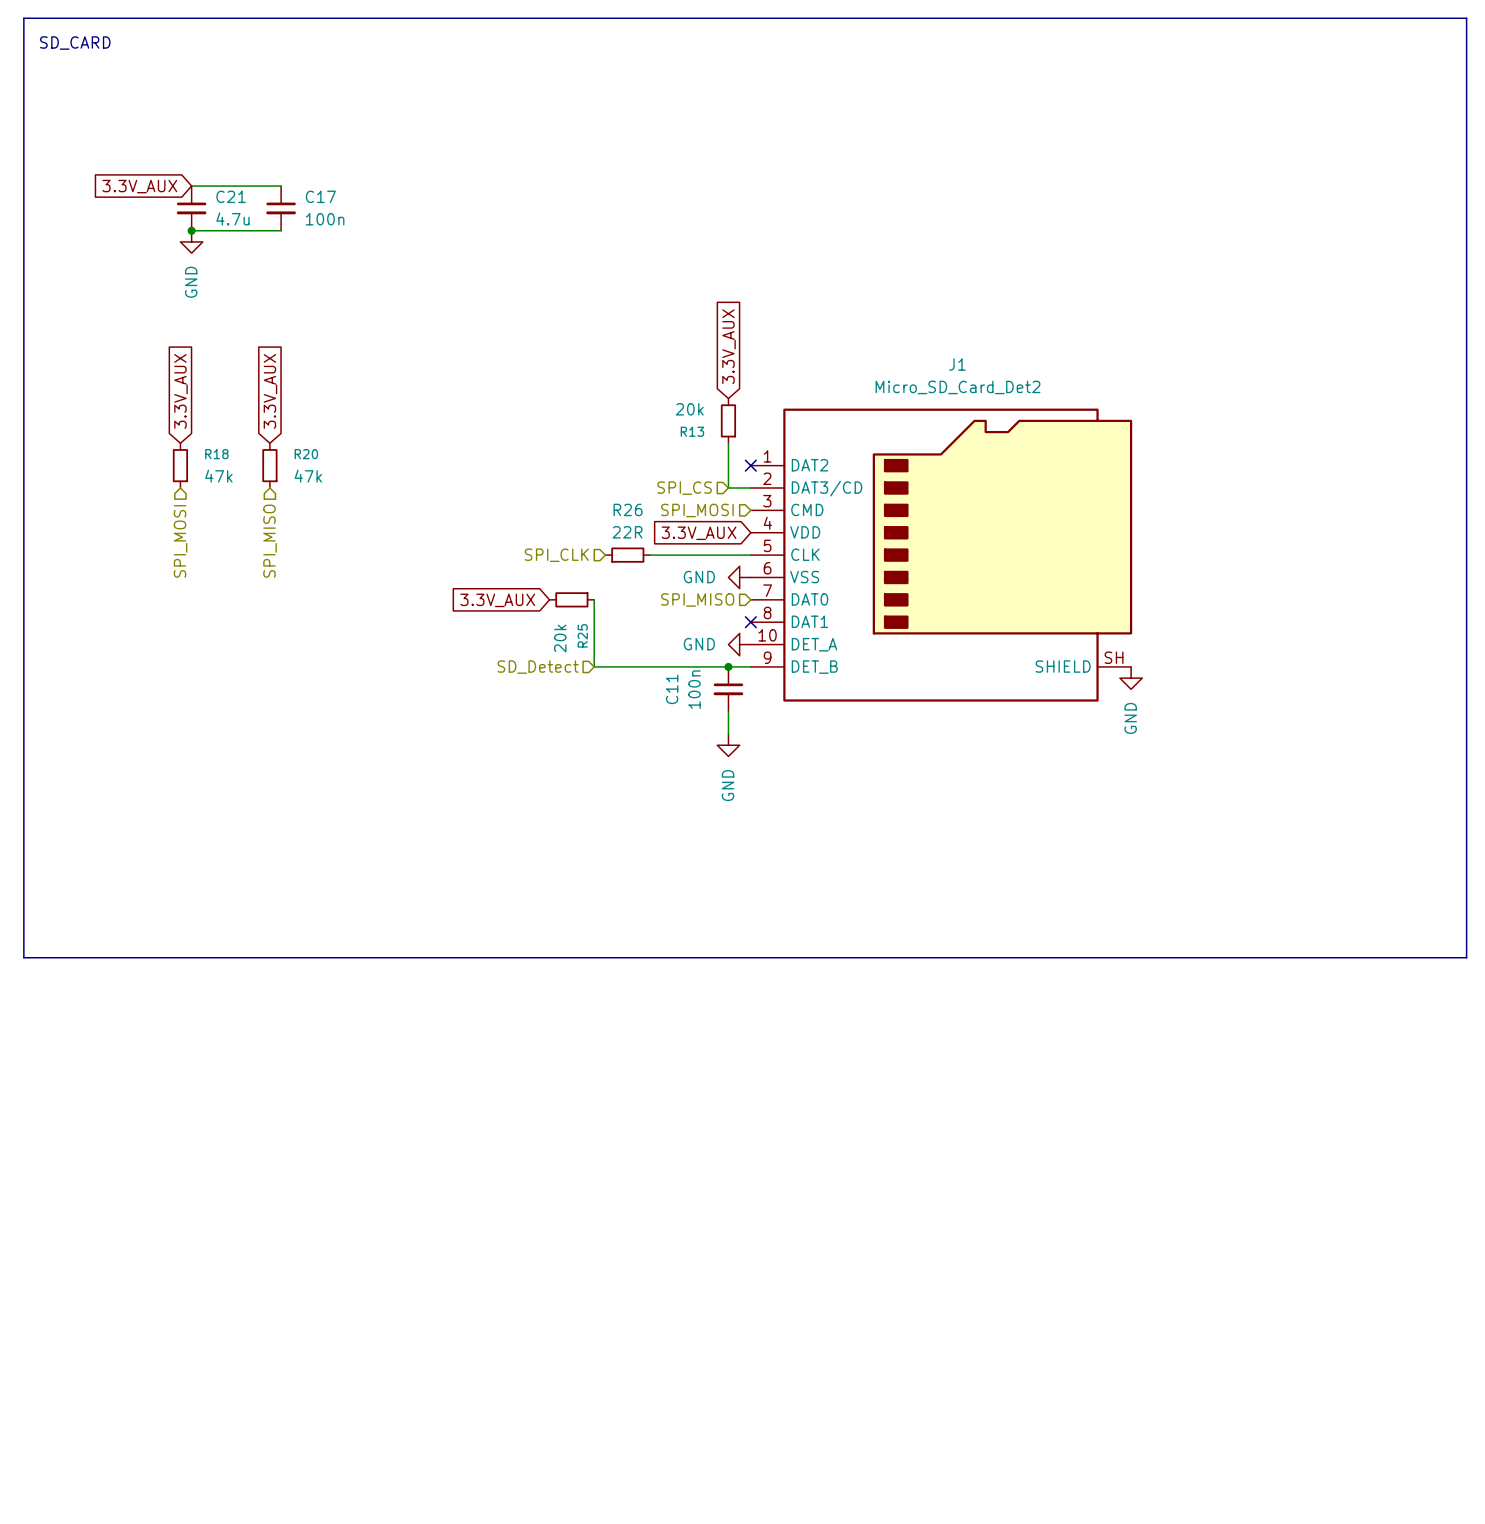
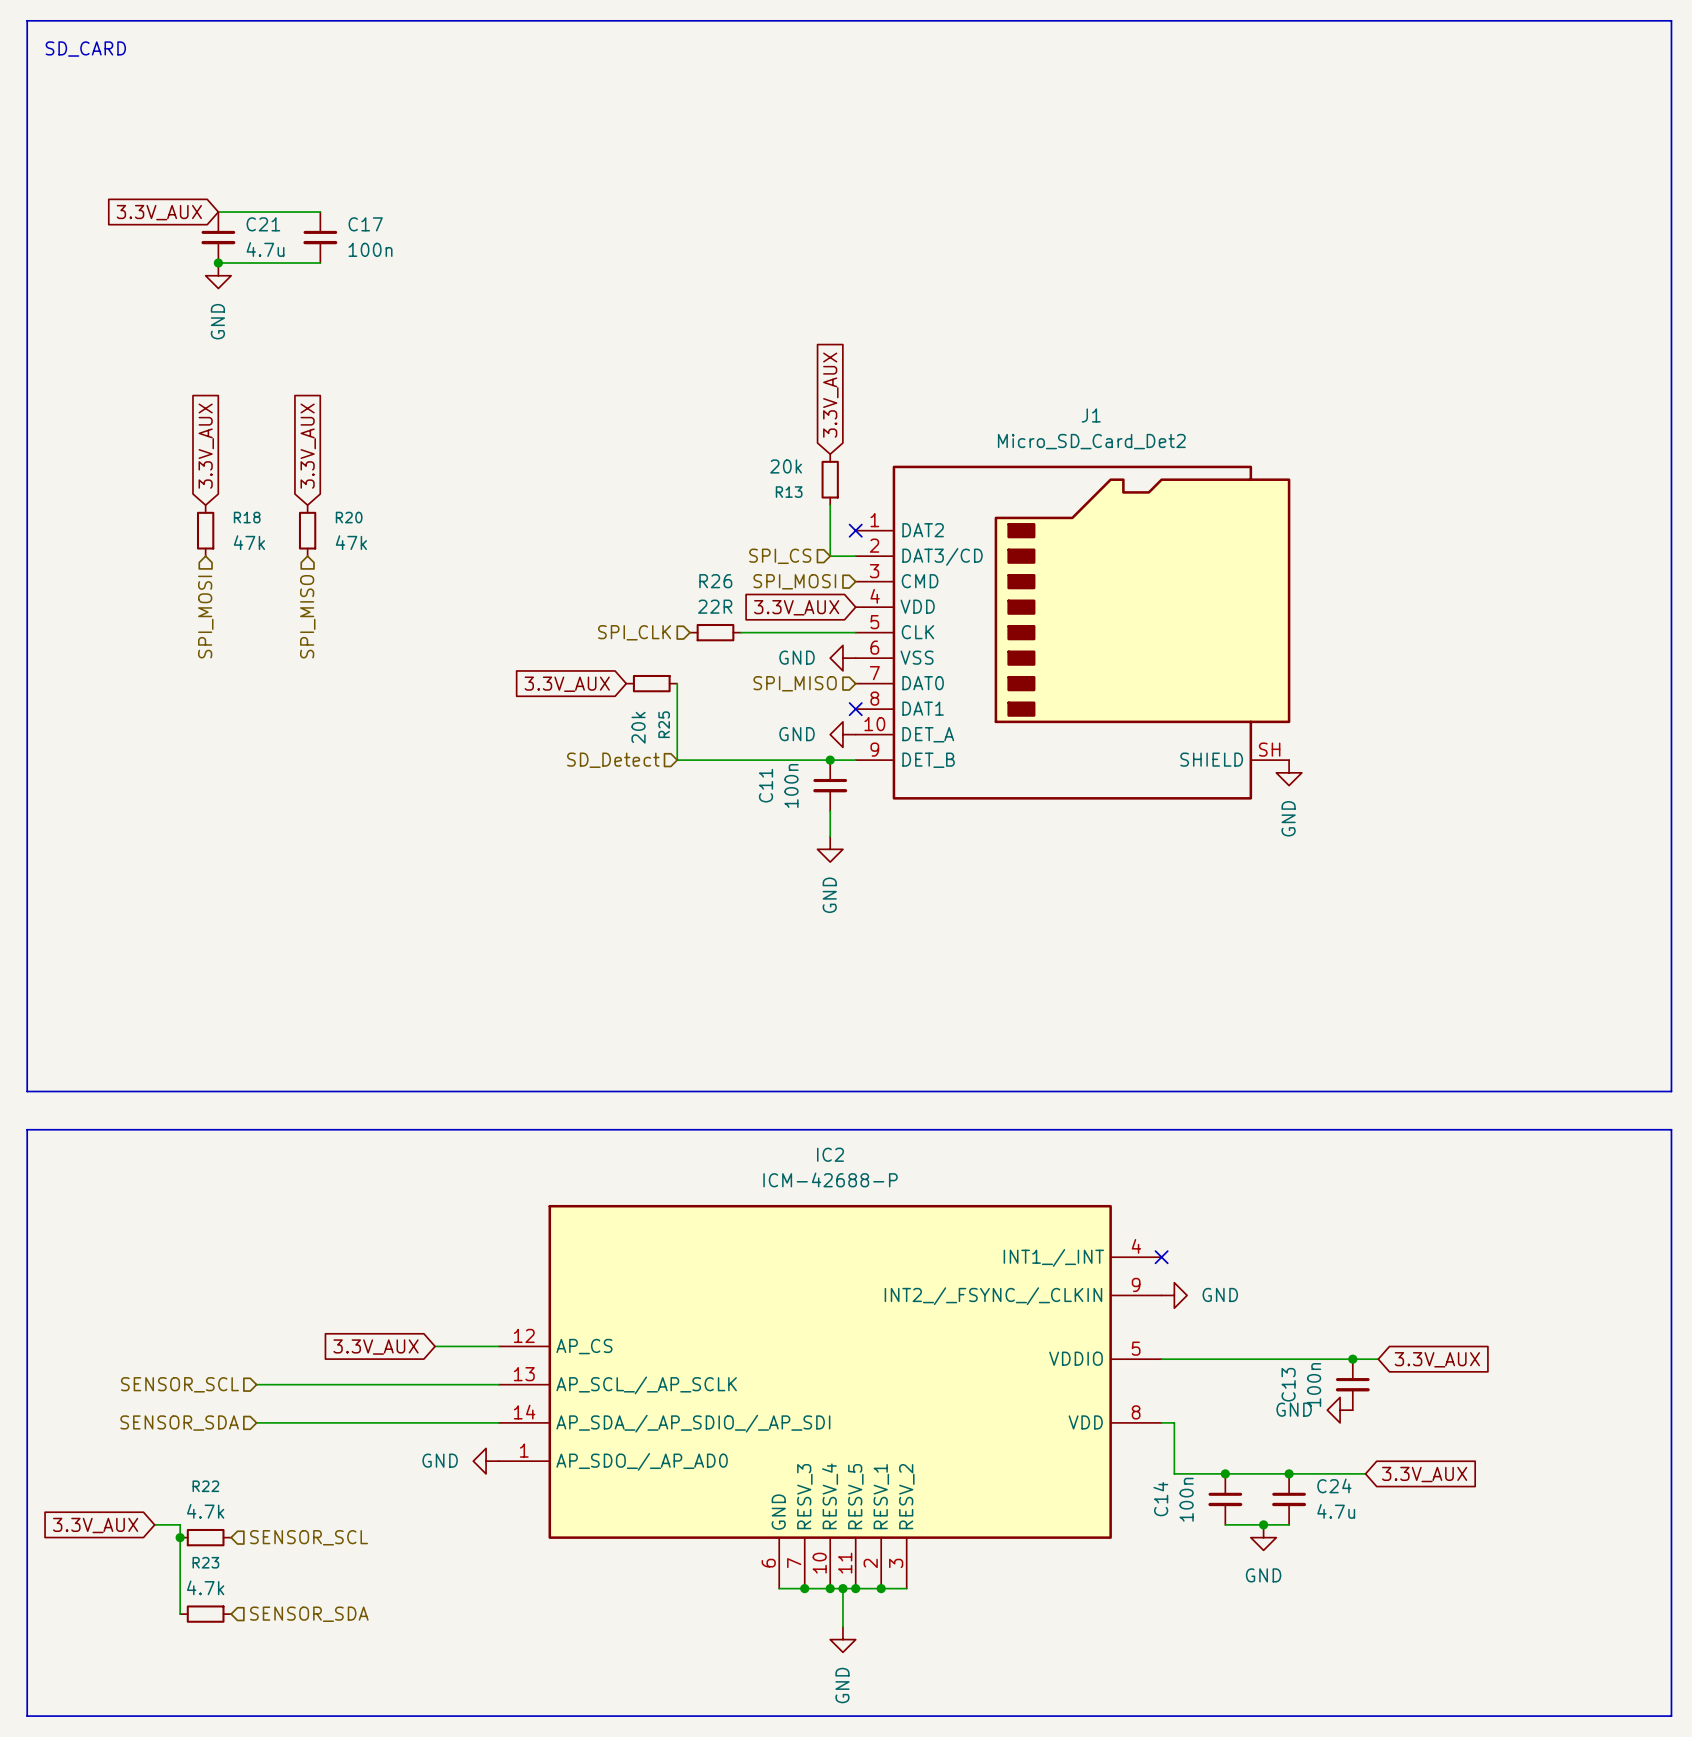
line: none -> (27, 1129) (1671, 1129) (1671, 1716) (27, 1716) (27, 1129)
no-connect mark: none -> (1161, 1257)
power symbol: none -> GND (1174, 1295)
global label: none -> 3.3V_AUX (376, 1347)
wire: none -> (435, 1346) (498, 1346)
wire: none -> (1161, 1359) (1378, 1359)
junction: none -> (1352, 1359)
global label: none -> 3.3V_AUX (1437, 1359)
wire: none -> (256, 1384) (498, 1384)
C13: none -> 100n (1352, 1384)
hierarchical label: none -> SENSOR_SCL (179, 1384)
IC2: none -> ICM-42688-P (830, 1396)
power symbol: none -> GND (1340, 1410)
hierarchical label: none -> SENSOR_SDA (179, 1423)
wire: none -> (256, 1422) (498, 1422)
wire: none -> (1161, 1422) (1174, 1422) (1174, 1473) (1365, 1473)
power symbol: none -> GND (486, 1461)
junction: none -> (1225, 1473)
junction: none -> (1289, 1473)
global label: none -> 3.3V_AUX (1424, 1474)
C14: none -> 100n (1225, 1499)
C24: none -> 4.7u (1289, 1499)
wire: none -> (154, 1524) (180, 1524) (180, 1614)
wire: none -> (1225, 1524) (1289, 1524)
junction: none -> (1263, 1524)
global label: none -> 3.3V_AUX (95, 1525)
junction: none -> (180, 1537)
R22: none -> 4.7k (205, 1537)
hierarchical label: none -> SENSOR_SCL (309, 1537)
power symbol: none -> GND (1263, 1537)
wire: none -> (779, 1588) (906, 1588)
junction: none -> (804, 1588)
junction: none -> (830, 1588)
wire: none -> (842, 1588) (842, 1626)
junction: none -> (842, 1588)
junction: none -> (855, 1588)
junction: none -> (881, 1588)
R23: none -> 4.7k (205, 1614)
hierarchical label: none -> SENSOR_SDA (309, 1614)
power symbol: none -> GND (842, 1639)

